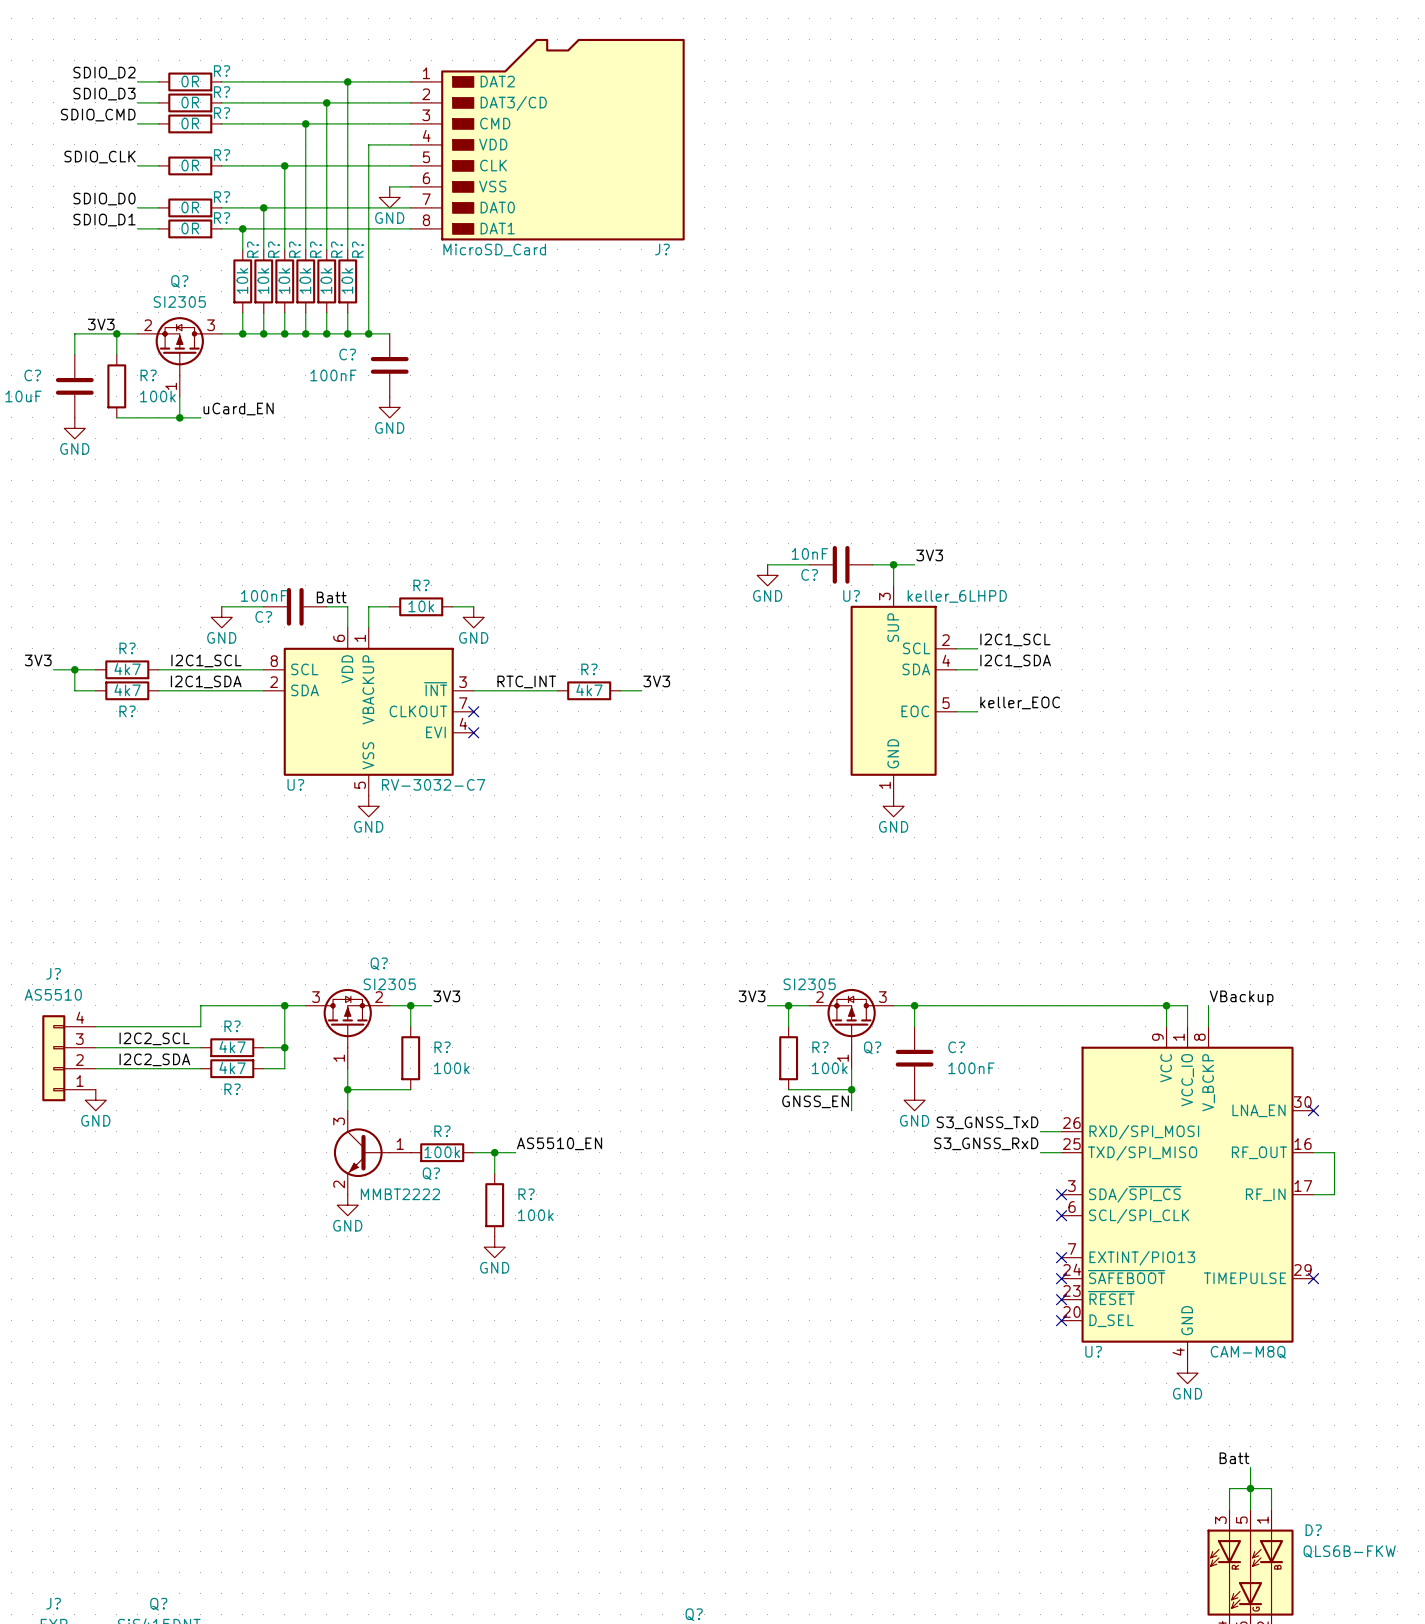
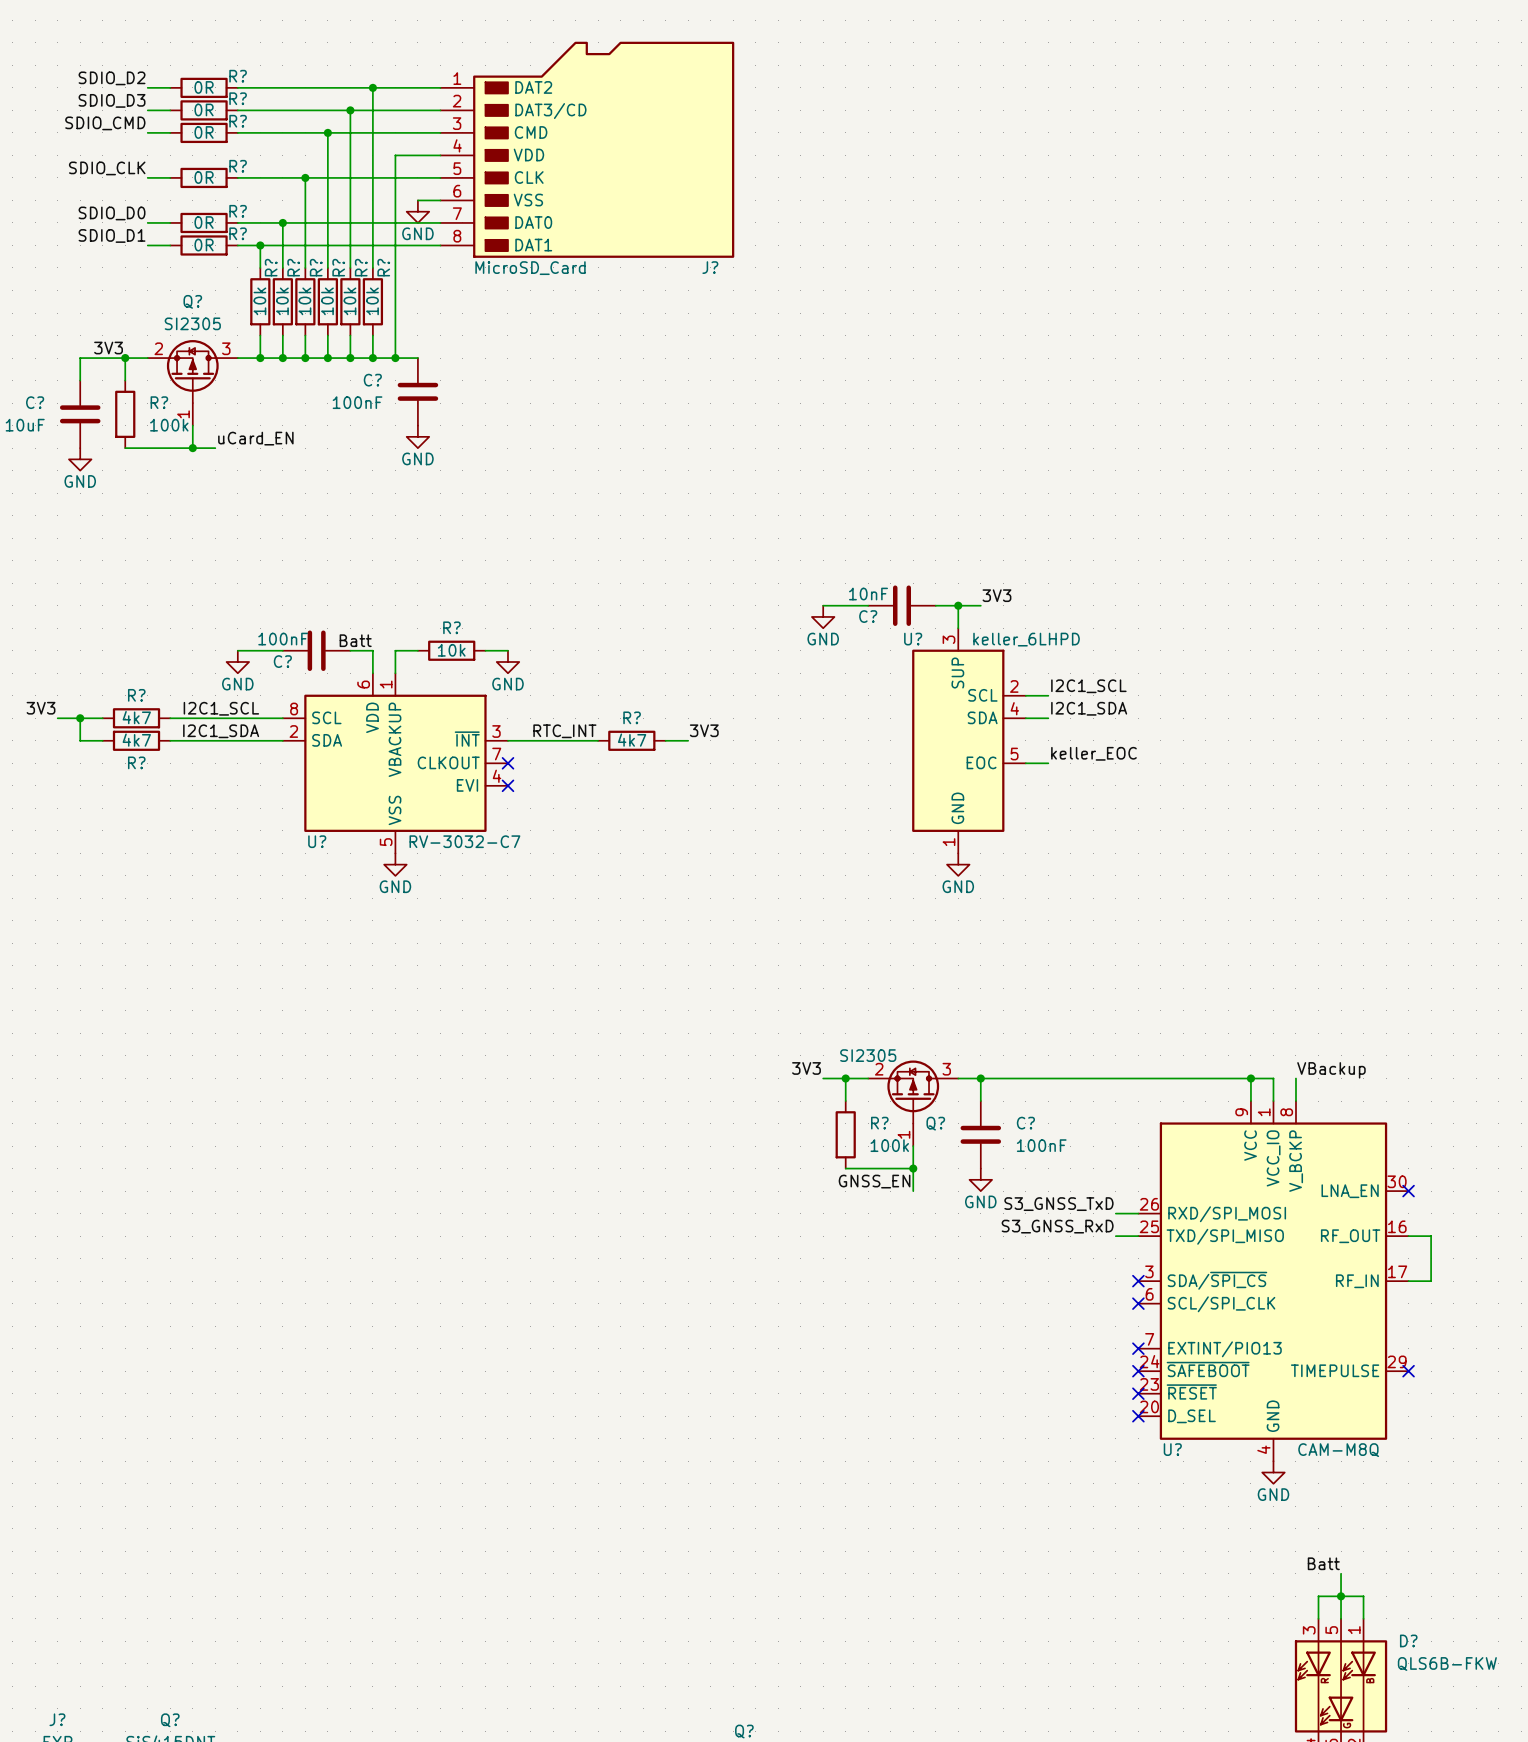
label: 3V3 (446, 996) -> none
wire: (284, 1005) (284, 1068) (263, 1068) -> none
junction: (284, 1005) -> none
wire: (305, 1005) (200, 1005) (200, 1026) (95, 1026) -> none
wire: (389, 1005) (431, 1005) -> none
wire: (410, 1005) (410, 1026) -> none
junction: (410, 1005) -> none
Q?: SI2305 (347, 1028) -> none
label: I2C2_SCL (154, 1038) -> none
wire: (95, 1047) (200, 1047) -> none
R?: 4k7 (232, 1047) -> none
wire: (263, 1047) (284, 1047) -> none
junction: (284, 1047) -> none
J?: AS5510 (69, 1058) -> none
R?: 100k (410, 1058) -> none
label: I2C2_SDA (154, 1059) -> none
wire: (95, 1068) (200, 1068) -> none
R?: 4k7 (232, 1068) -> none
wire: (347, 1068) (347, 1110) -> none
wire: (347, 1089) (410, 1089) -> none
junction: (347, 1089) -> none
power symbol: GND (95, 1100) -> none
label: AS5510_EN (559, 1143) -> none
Q?: MMBT2222 (372, 1152) -> none
R?: 100k (442, 1152) -> none
wire: (473, 1152) (515, 1152) -> none
wire: (494, 1152) (494, 1173) -> none
junction: (494, 1152) -> none
power symbol: GND (347, 1205) -> none
R?: 100k (494, 1205) -> none
power symbol: GND (494, 1247) -> none

